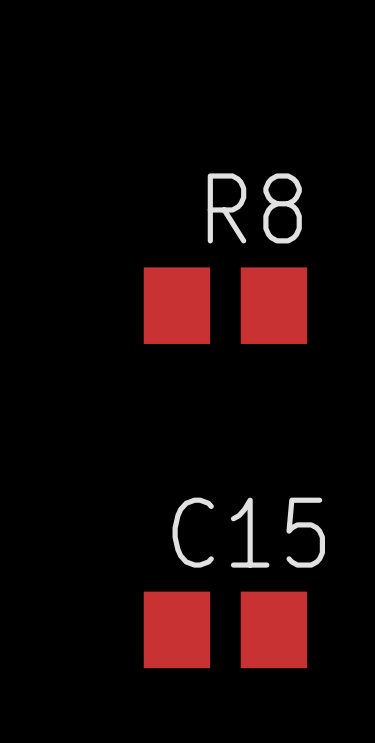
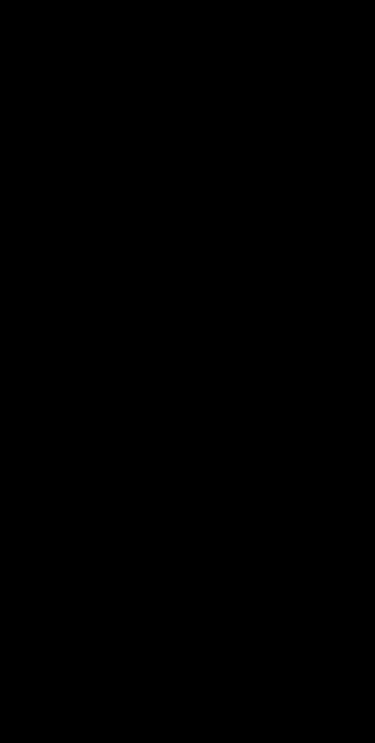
R8: (225, 305) -> none
C15: (225, 629) -> none

